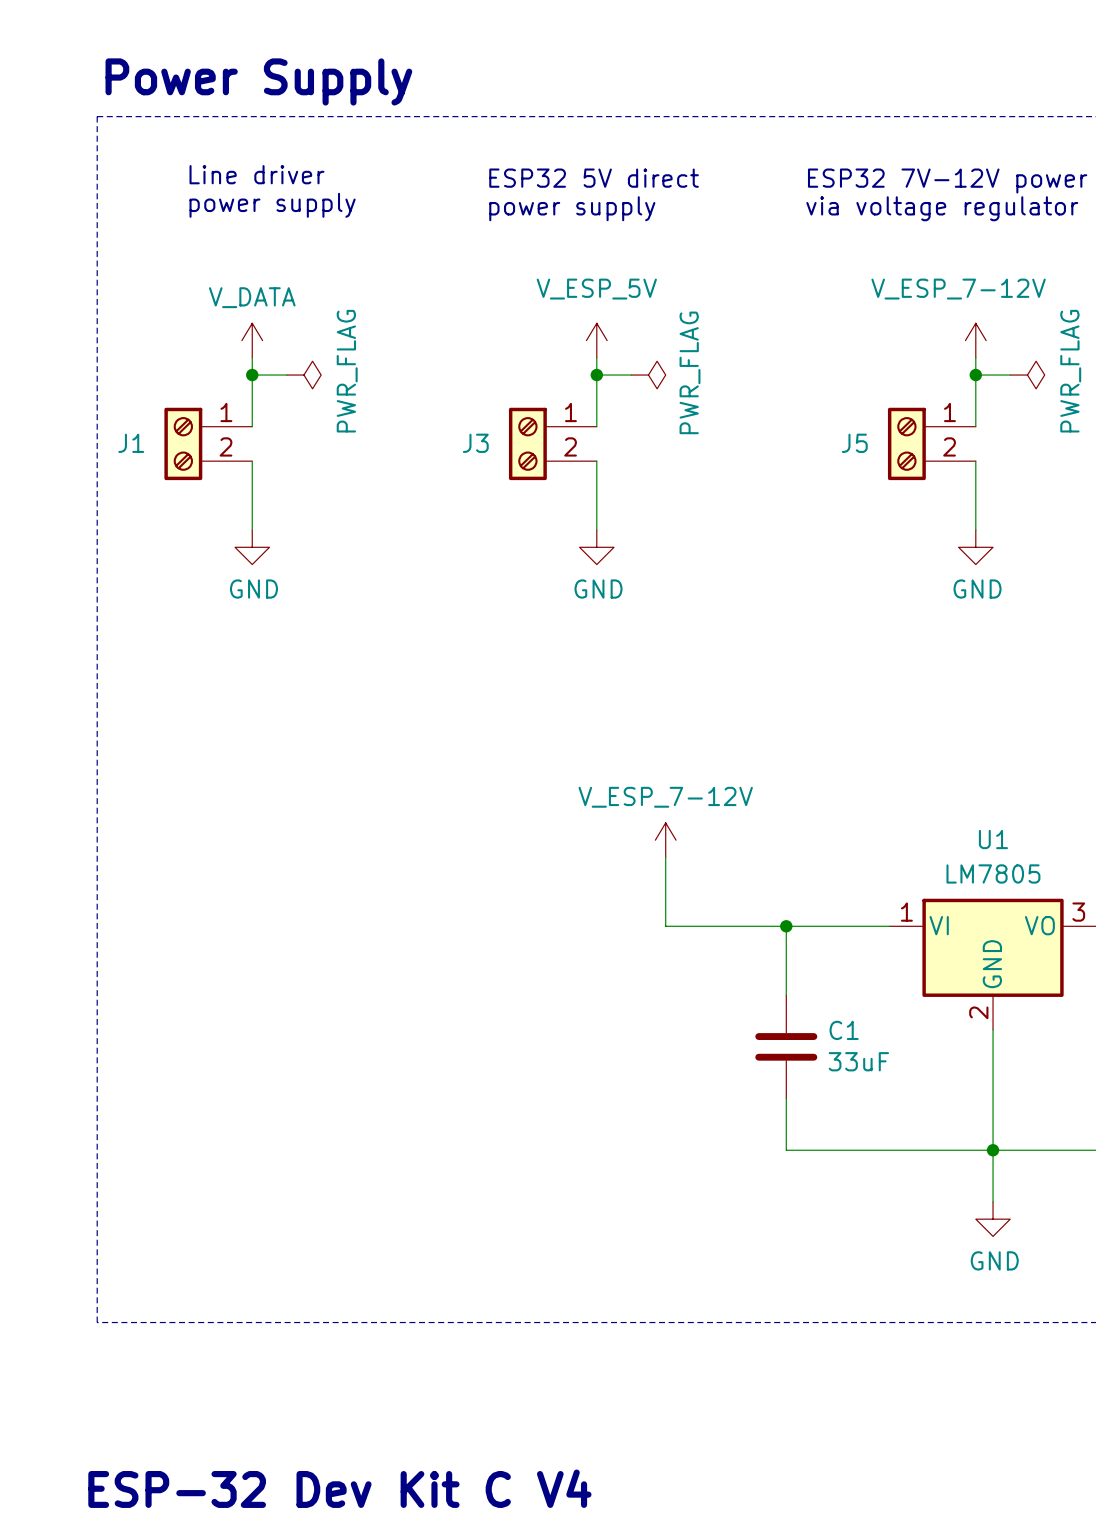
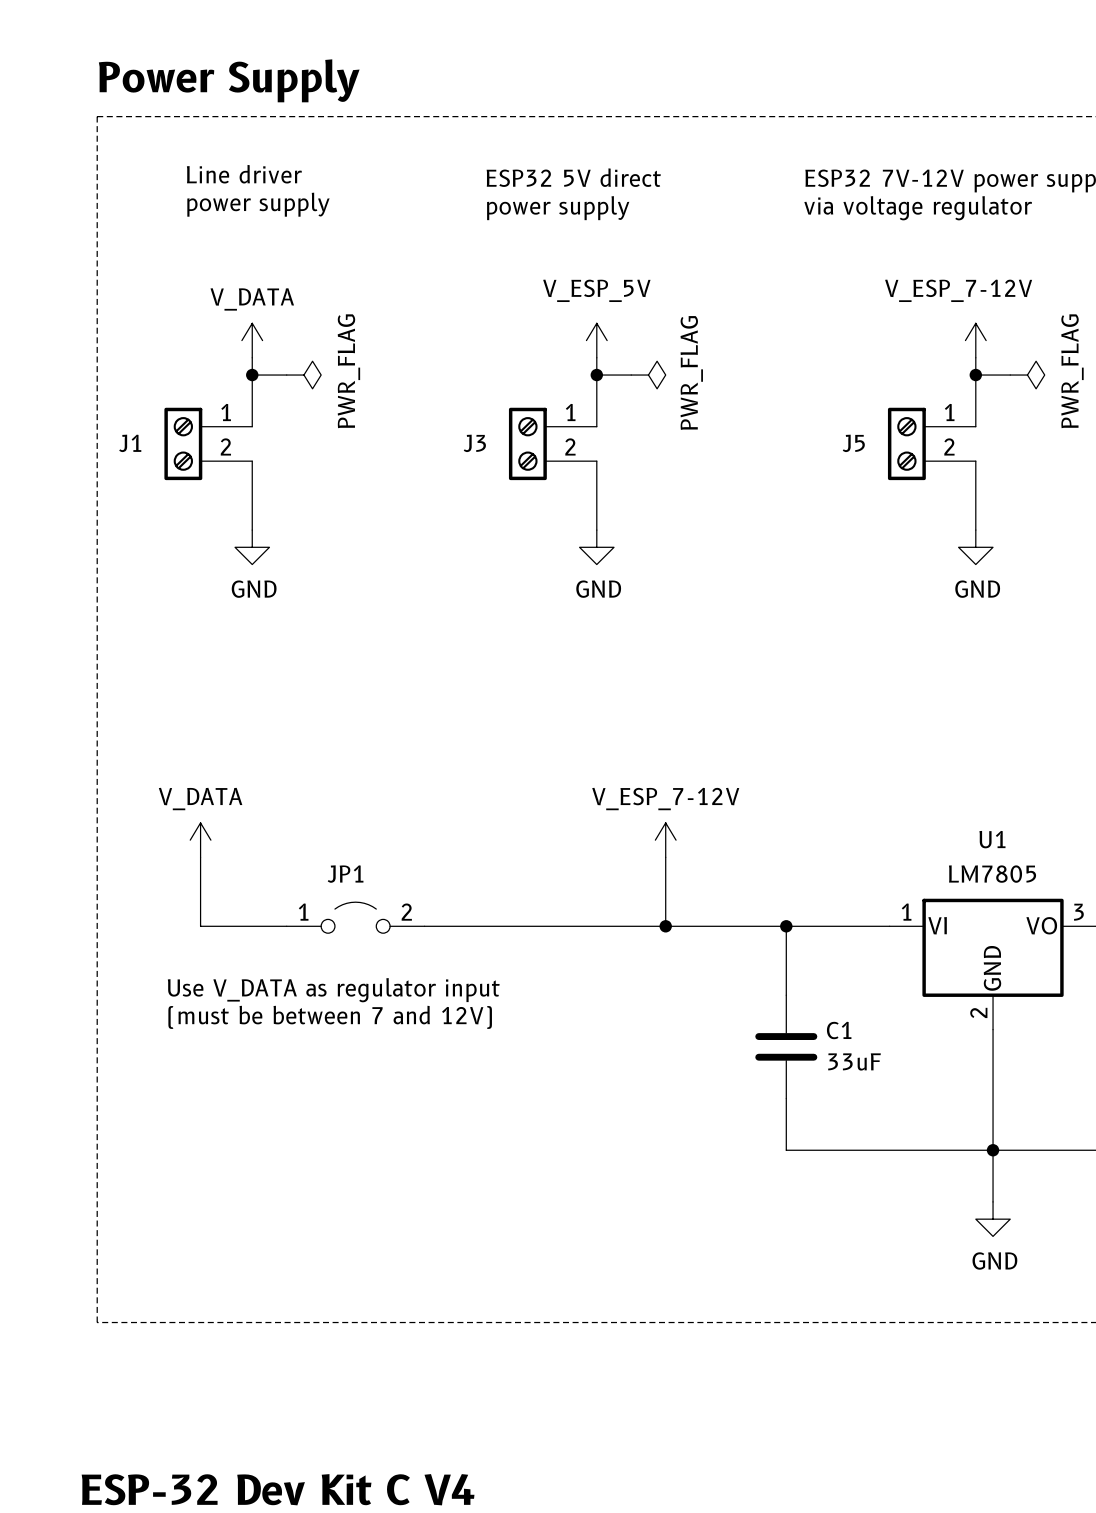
power symbol: none -> V_DATA (200, 840)
wire: none -> (200, 857) (200, 926) (286, 926)
JP1: none -> (355, 917)
wire: none -> (424, 926) (665, 926)
junction: none -> (665, 926)
text: none -> Use V_DATA as regulator input (333, 990)
text: none -> (must be between 7 and 12V) (330, 1017)

